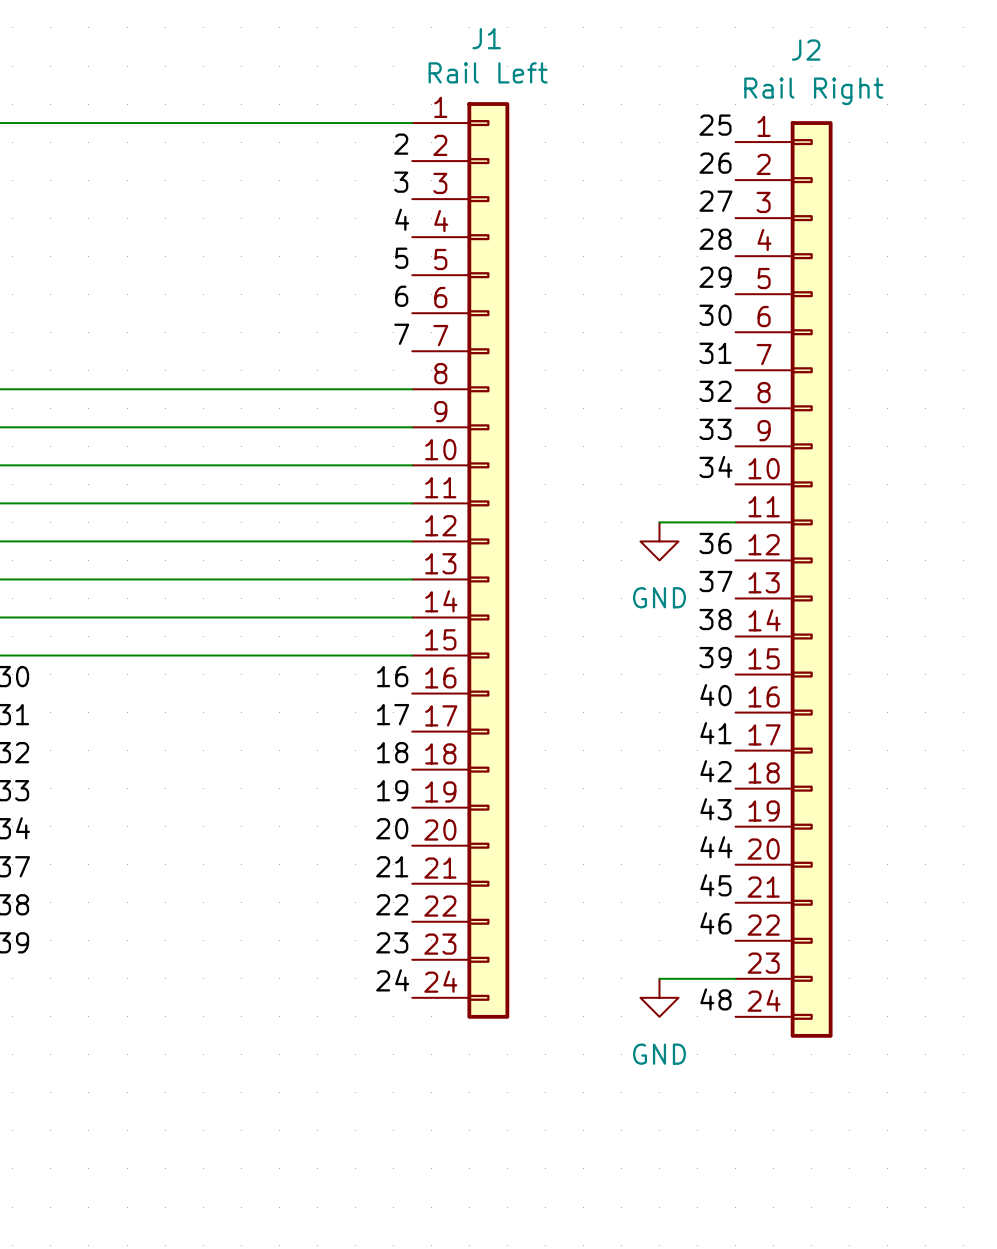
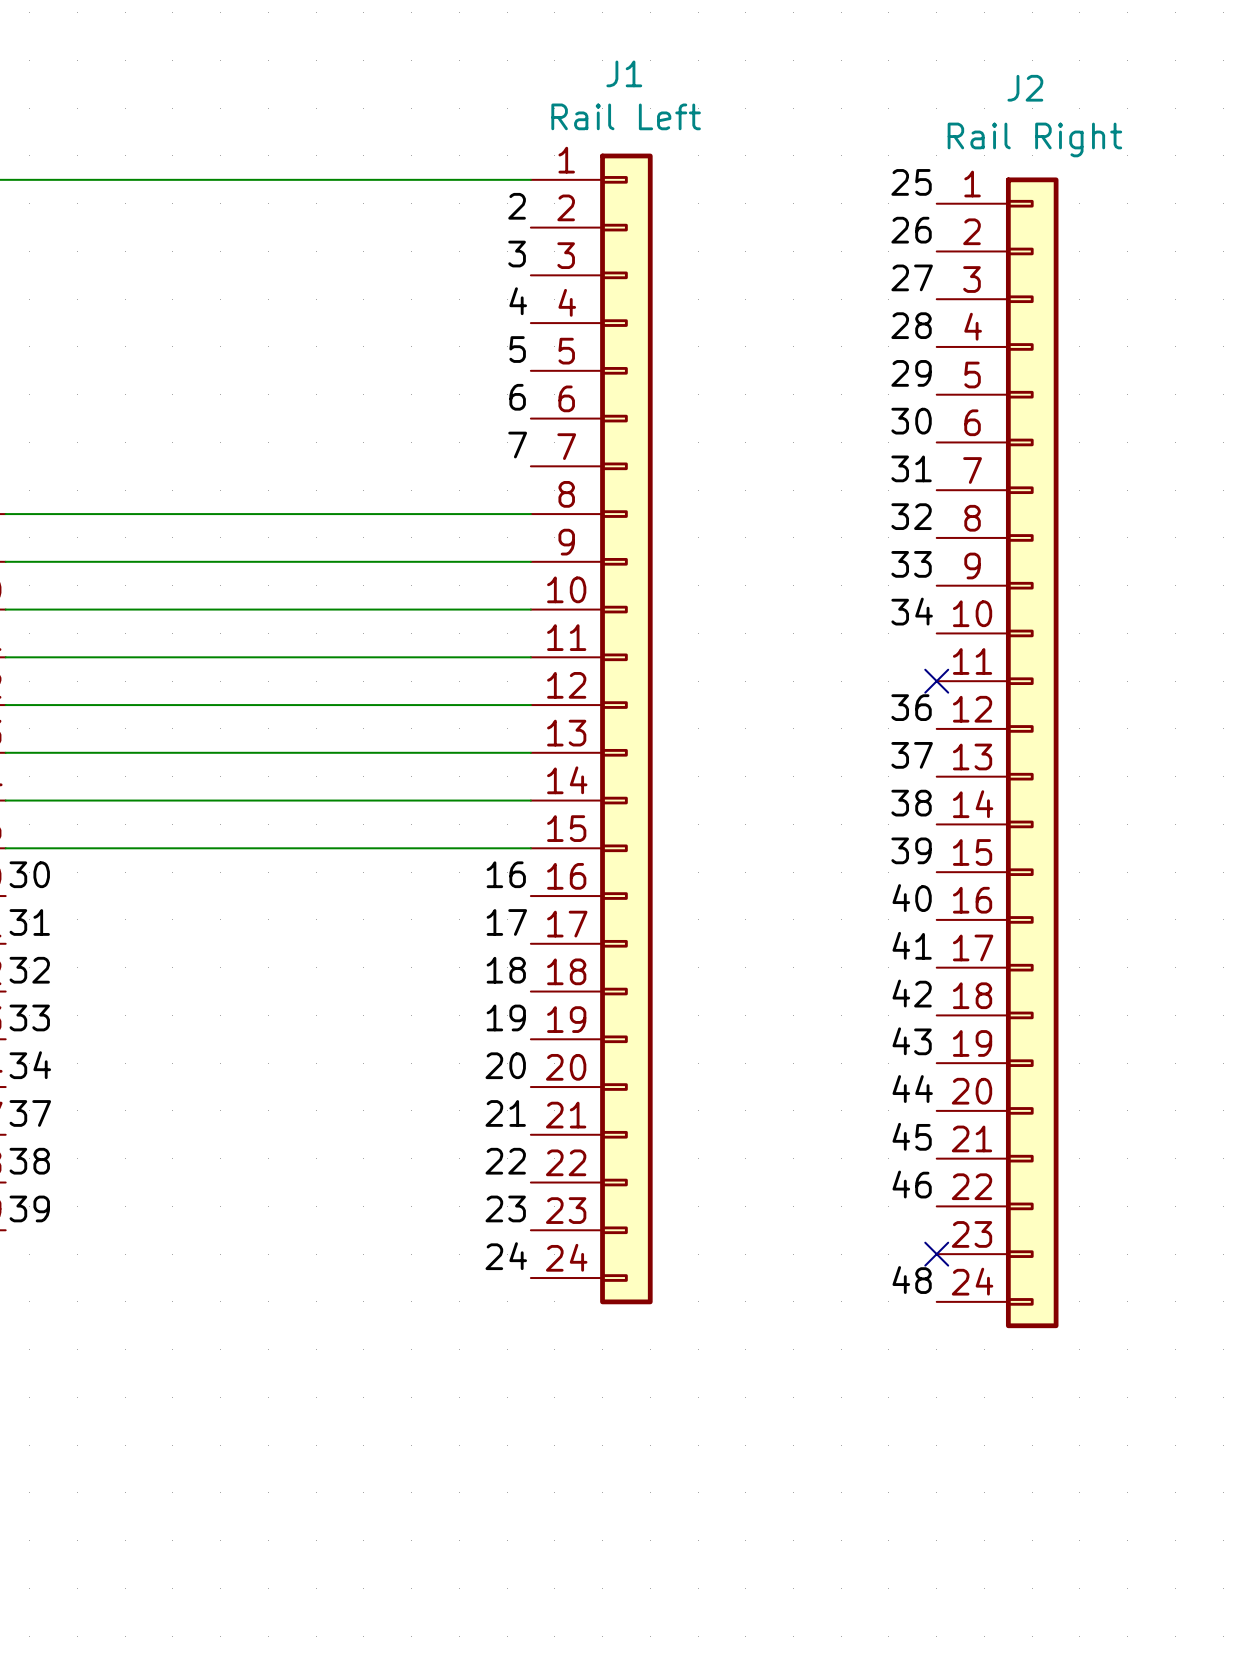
wire: (659, 522) (735, 522) -> none
no-connect mark: none -> (936, 681)
power symbol: GND (659, 541) -> none
wire: (659, 978) (735, 978) -> none
no-connect mark: none -> (936, 1254)
power symbol: GND (659, 997) -> none

